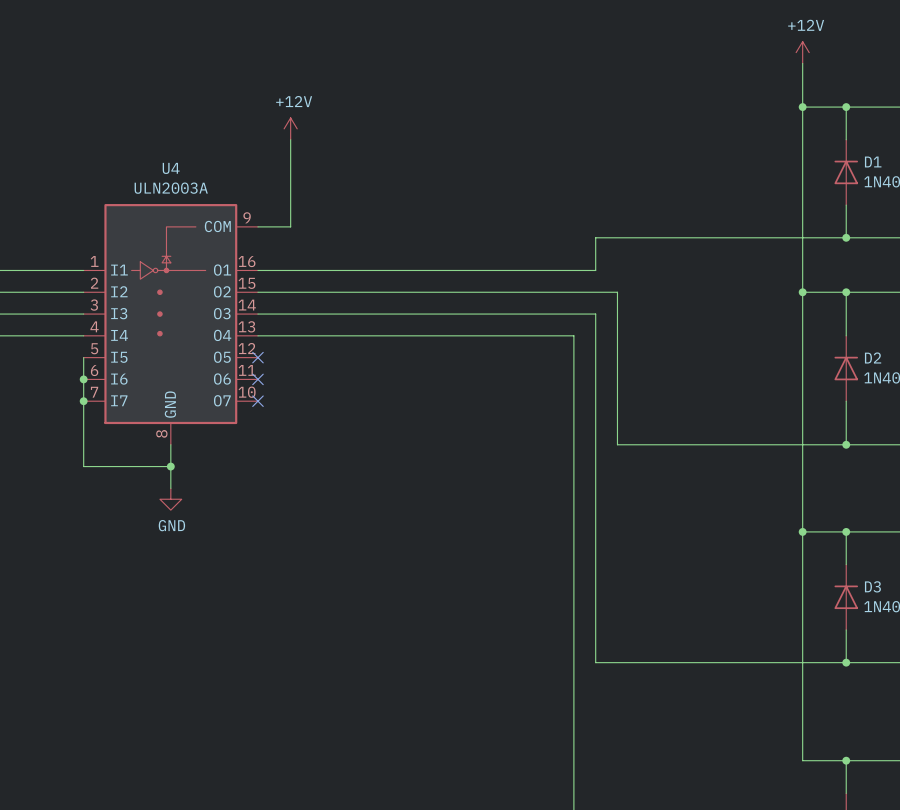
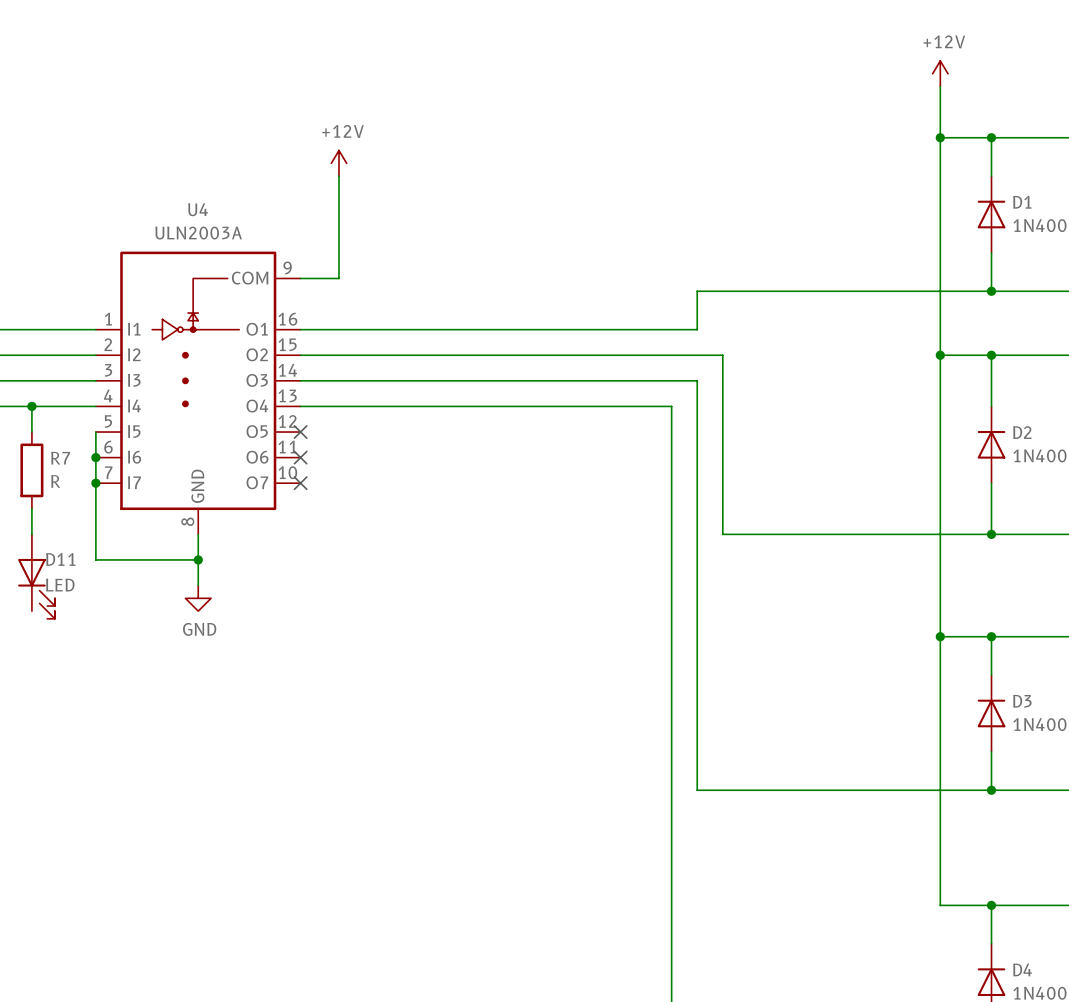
wire: none -> (31, 406) (31, 432)
junction: none -> (31, 406)
R7: none -> R (31, 470)
wire: none -> (31, 508) (31, 534)
D11: none -> LED (36, 576)

